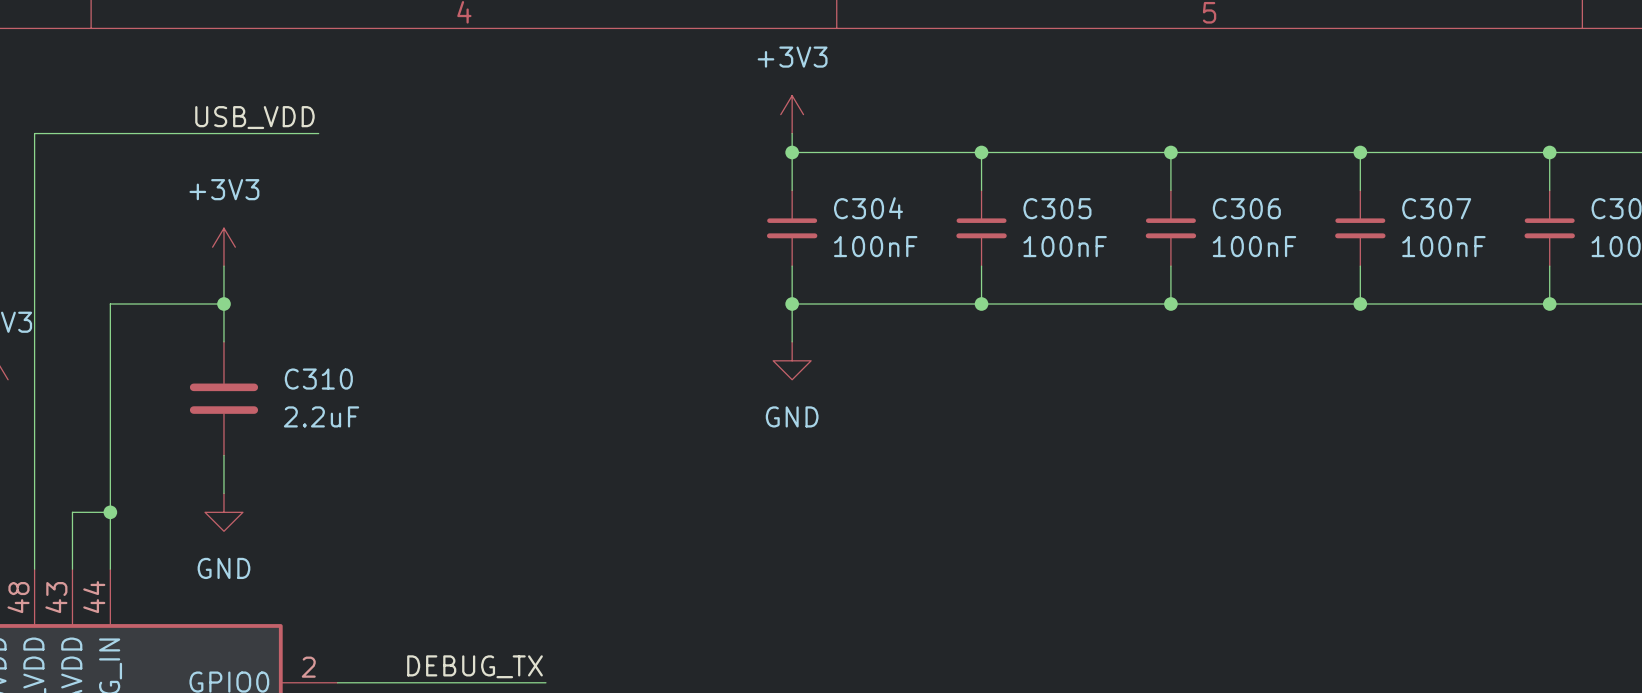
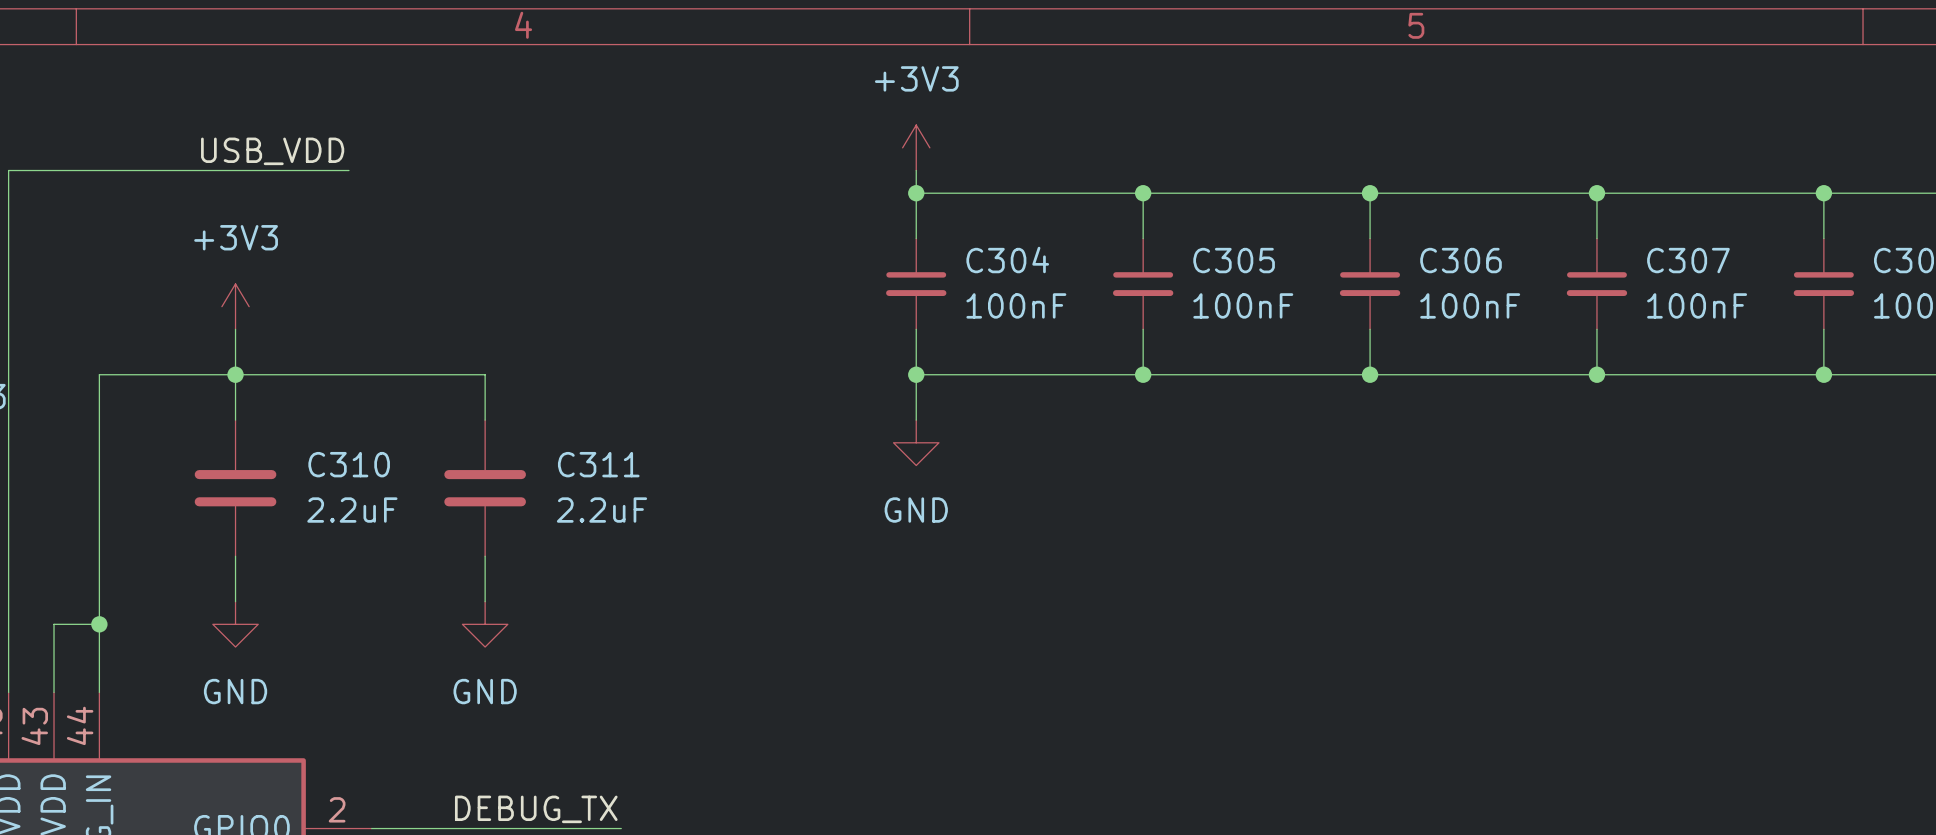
wire: none -> (235, 374) (485, 374) (485, 420)
C311: none -> 2.2uF (485, 488)
wire: none -> (485, 556) (485, 601)
power symbol: none -> GND (485, 624)

